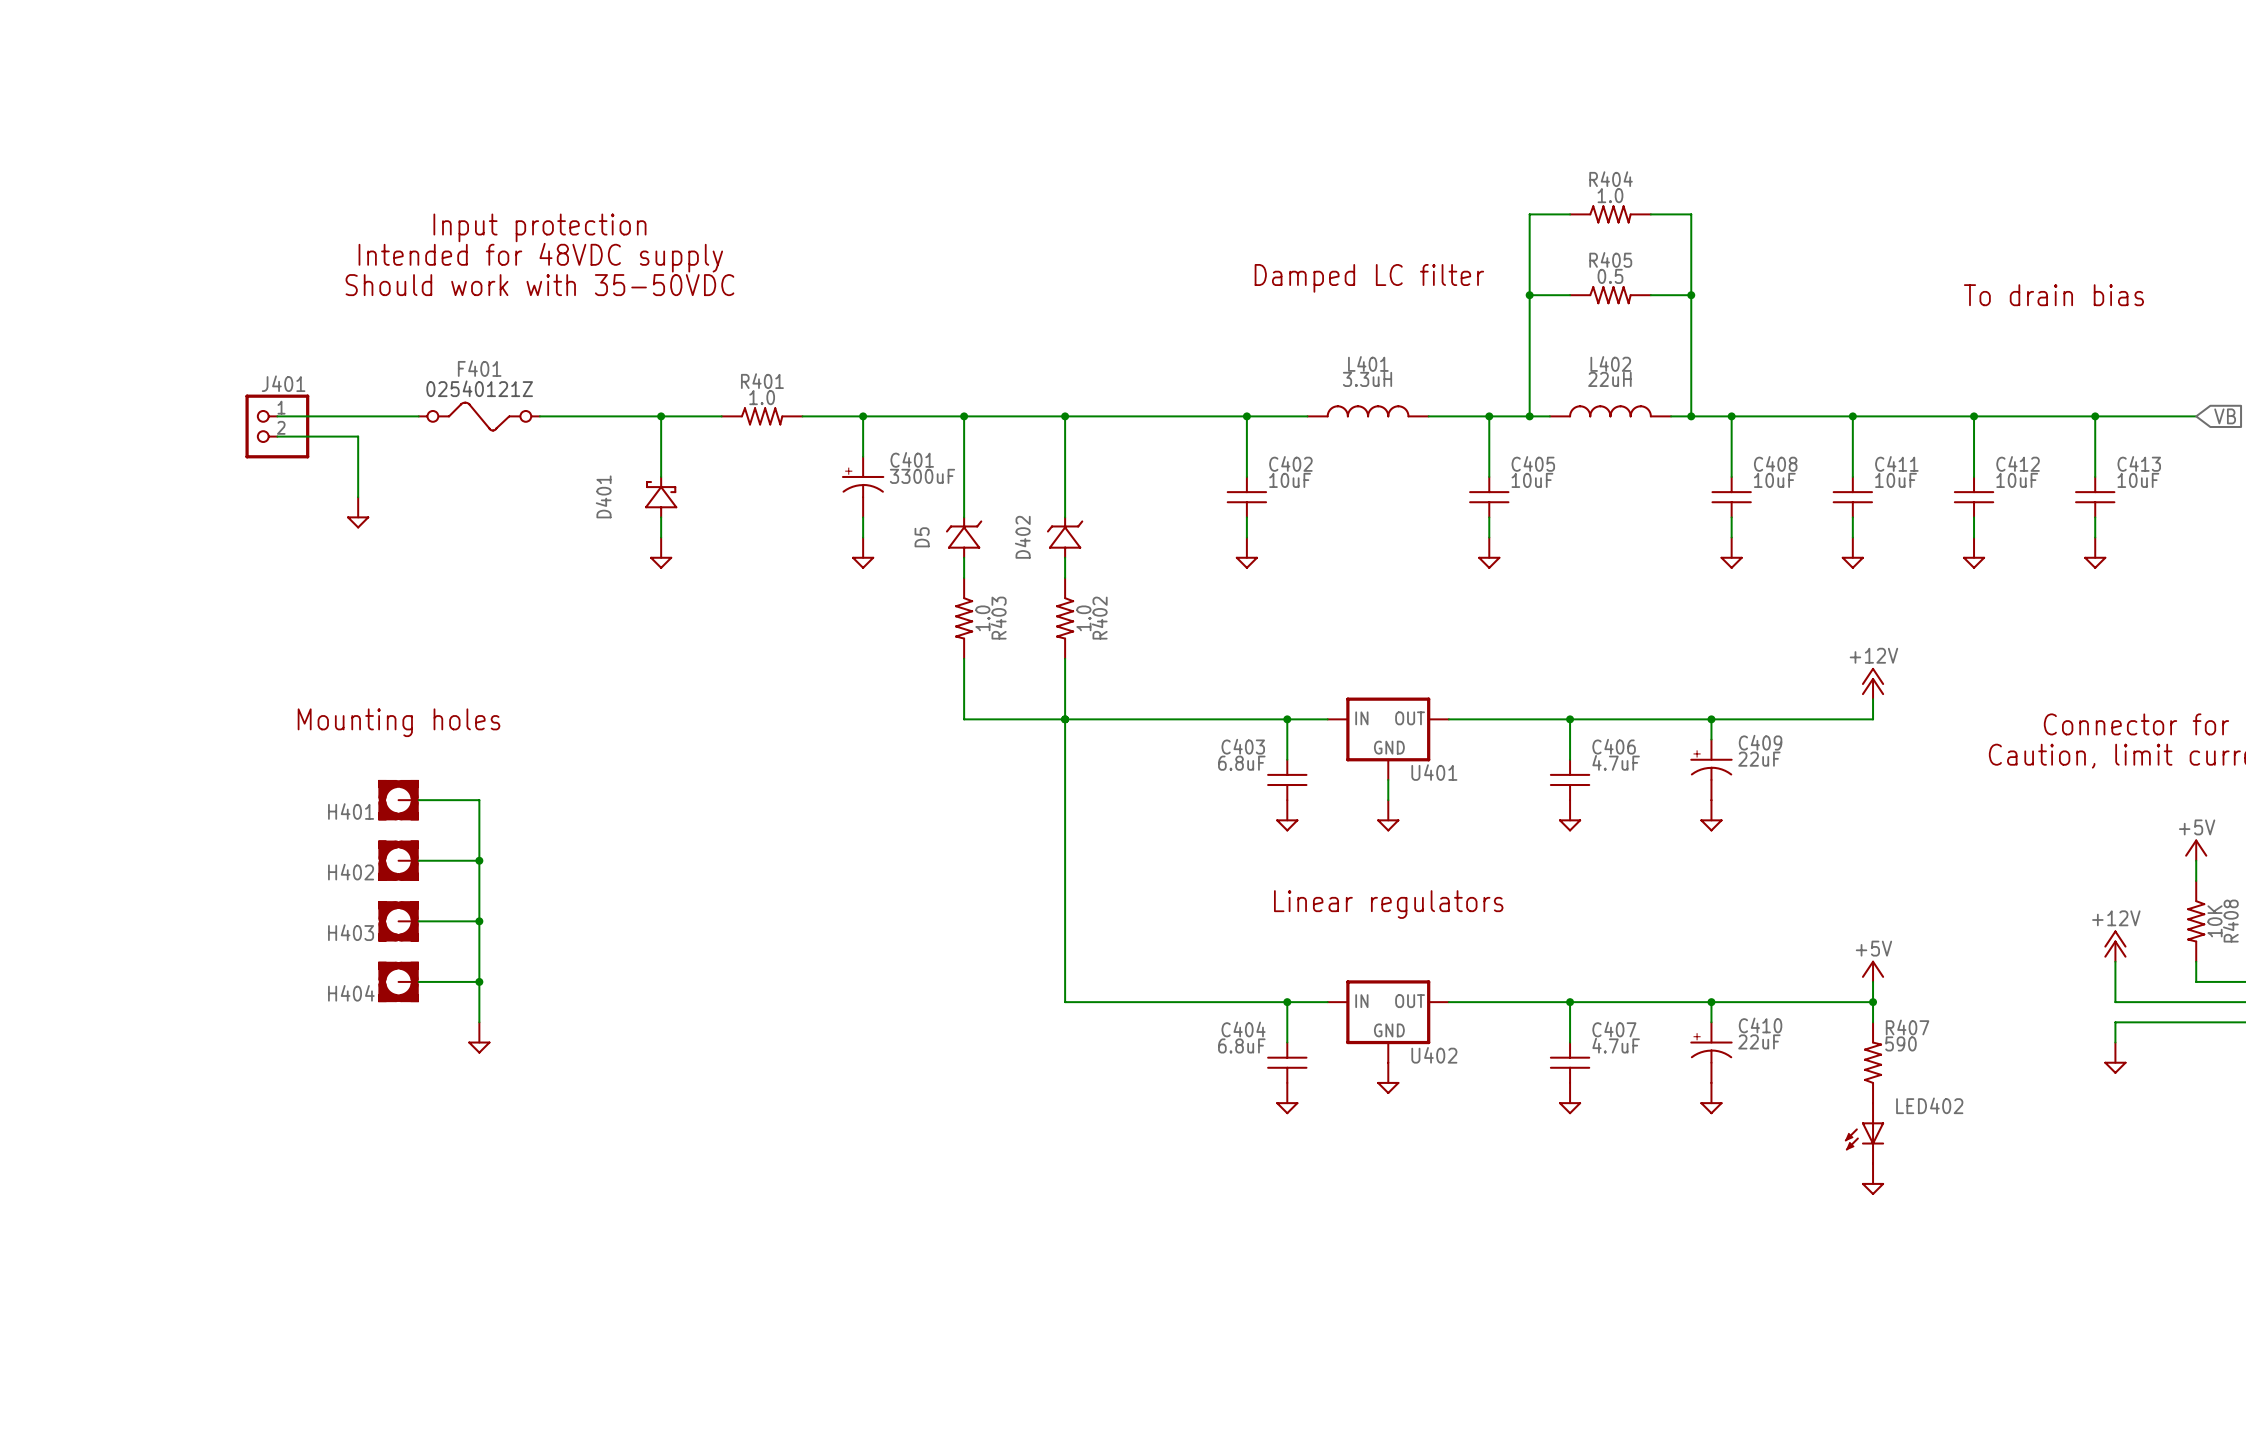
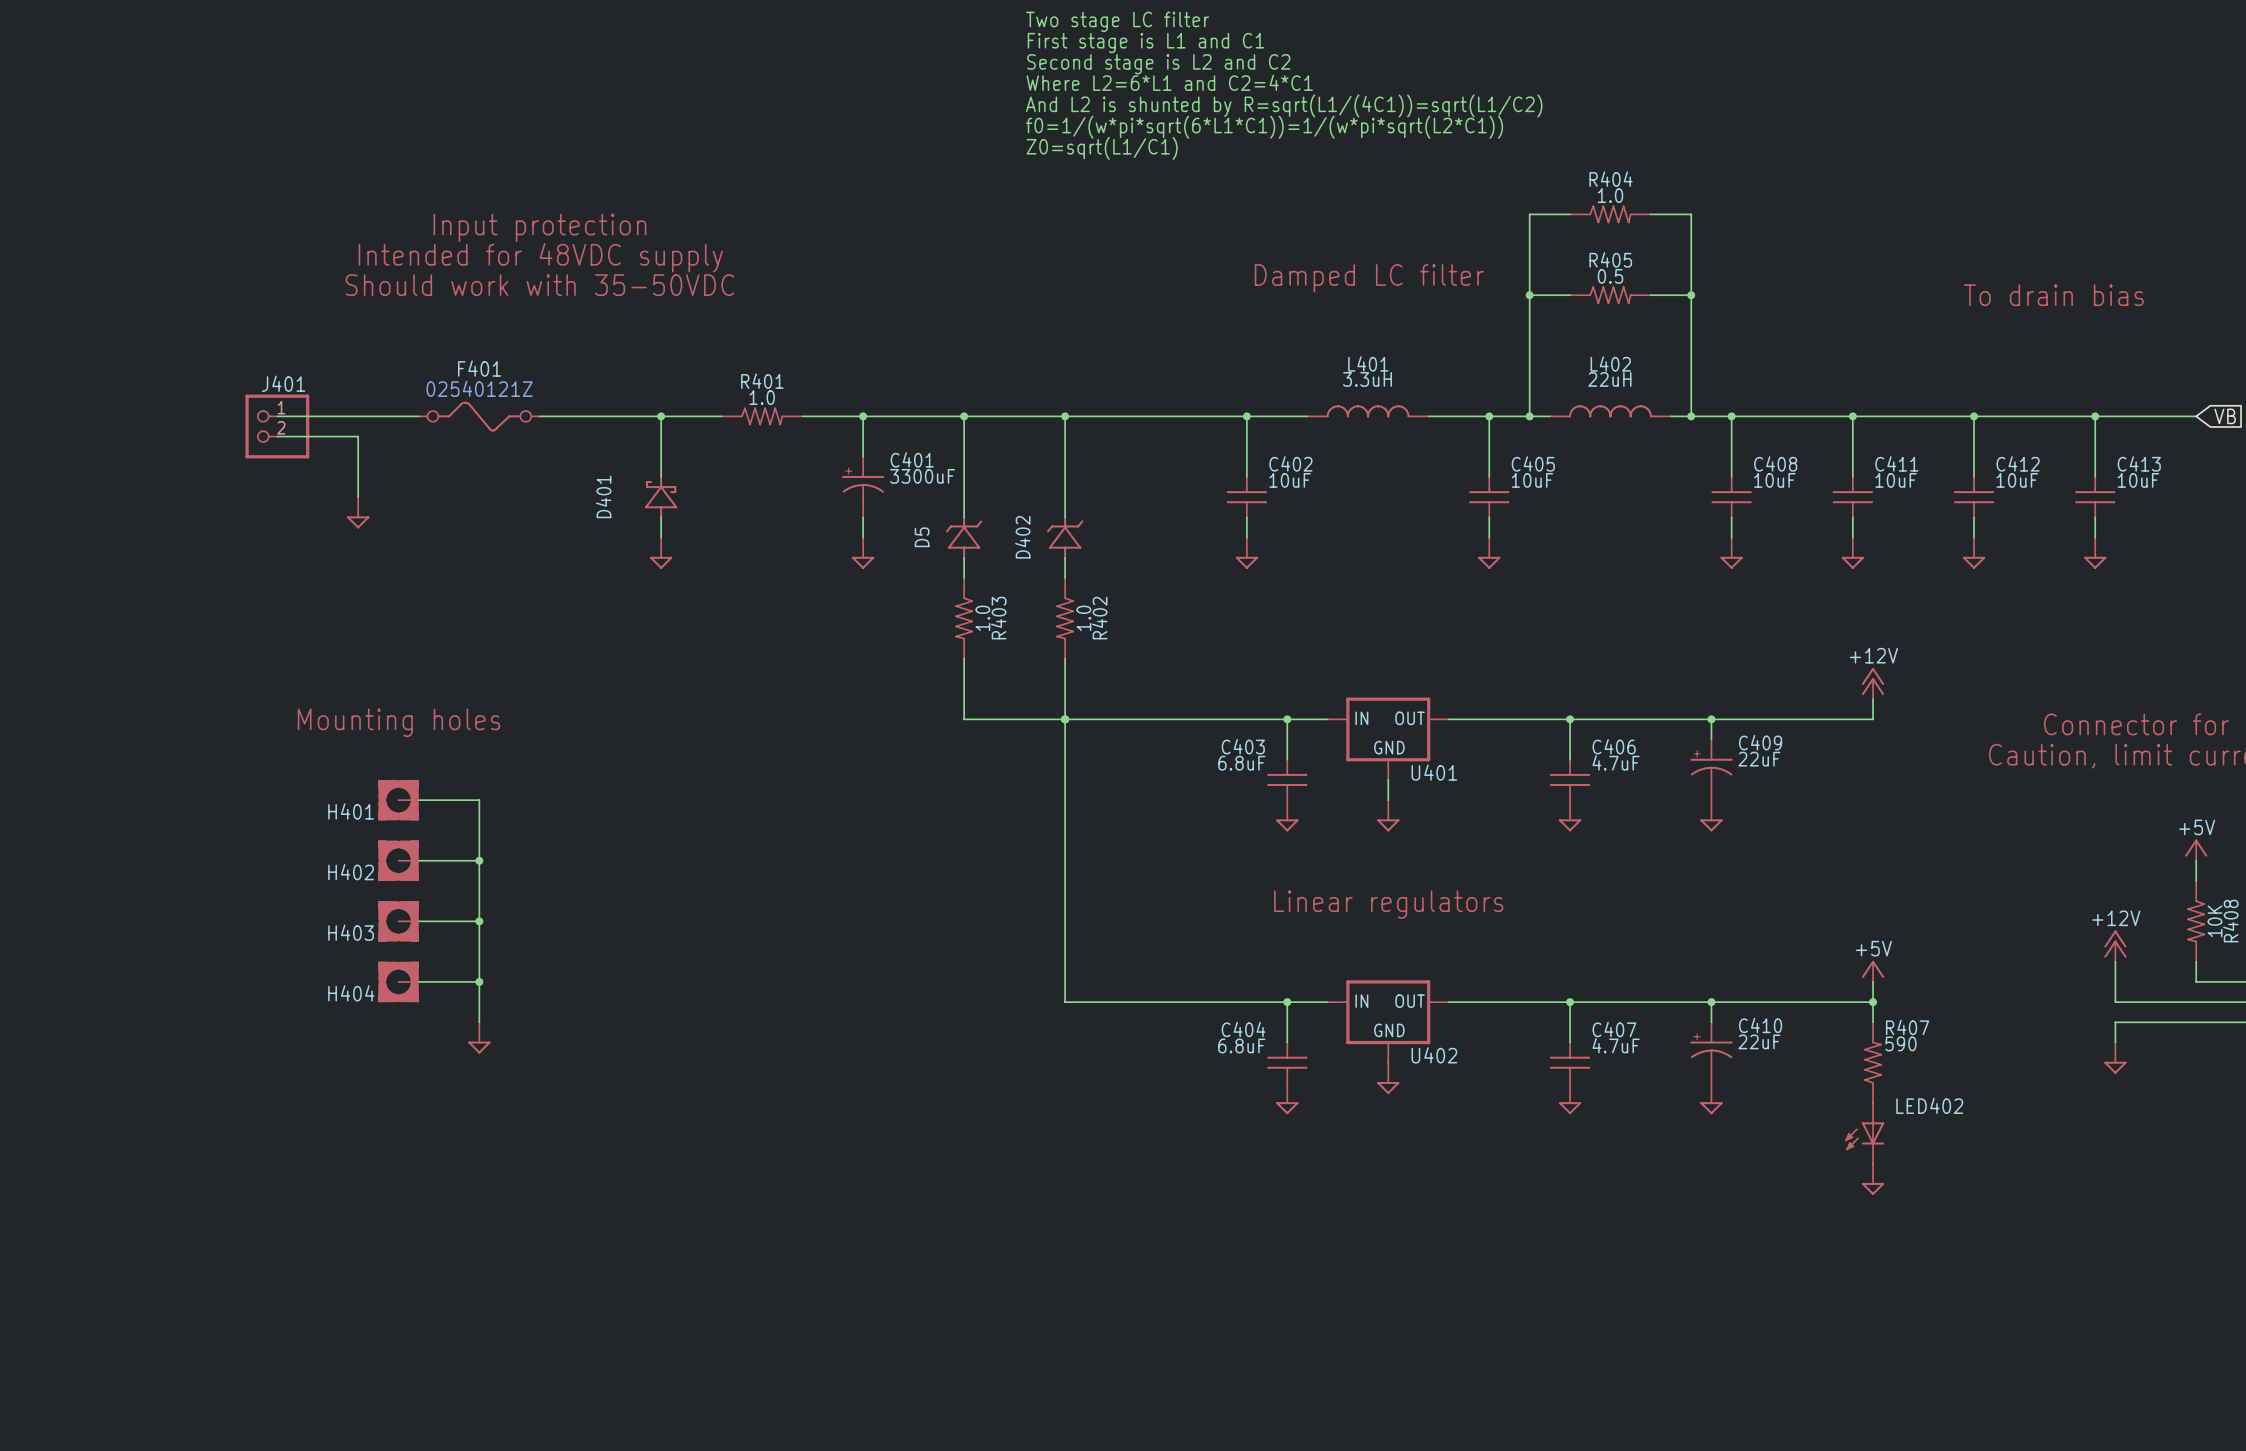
text: none -> Two stage LC filter (1117, 21)
text: none -> First stage is L1 and C1 (1146, 43)
text: none -> Second stage is L2 and C2 (1158, 64)
text: none -> Where L2=6*L1 and C2=4*C1 (1169, 82)
text: none -> And L2 is shunted by R=sqrt(L1/(4C1))=sqrt(L1/C2) (1284, 106)
text: none -> f0=1/(w*pi*sqrt(6*L1*C1))=1/(w*pi*sqrt(L2*C1)) (1264, 127)
text: none -> Z0=sqrt(L1/C1) (1102, 148)

